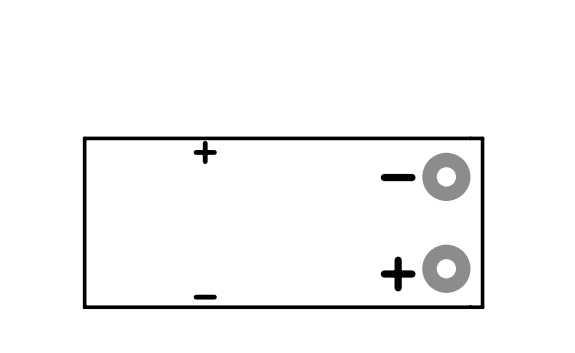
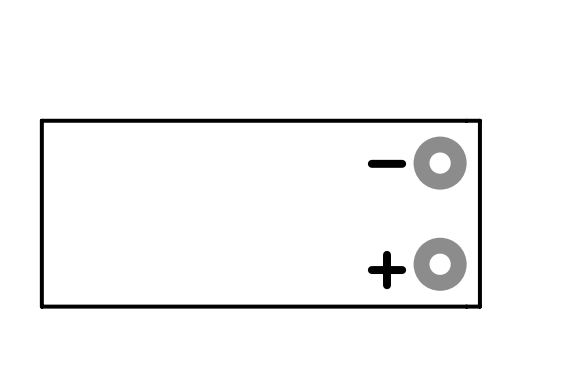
text: + (205, 152) -> none
text: - (205, 297) -> none

